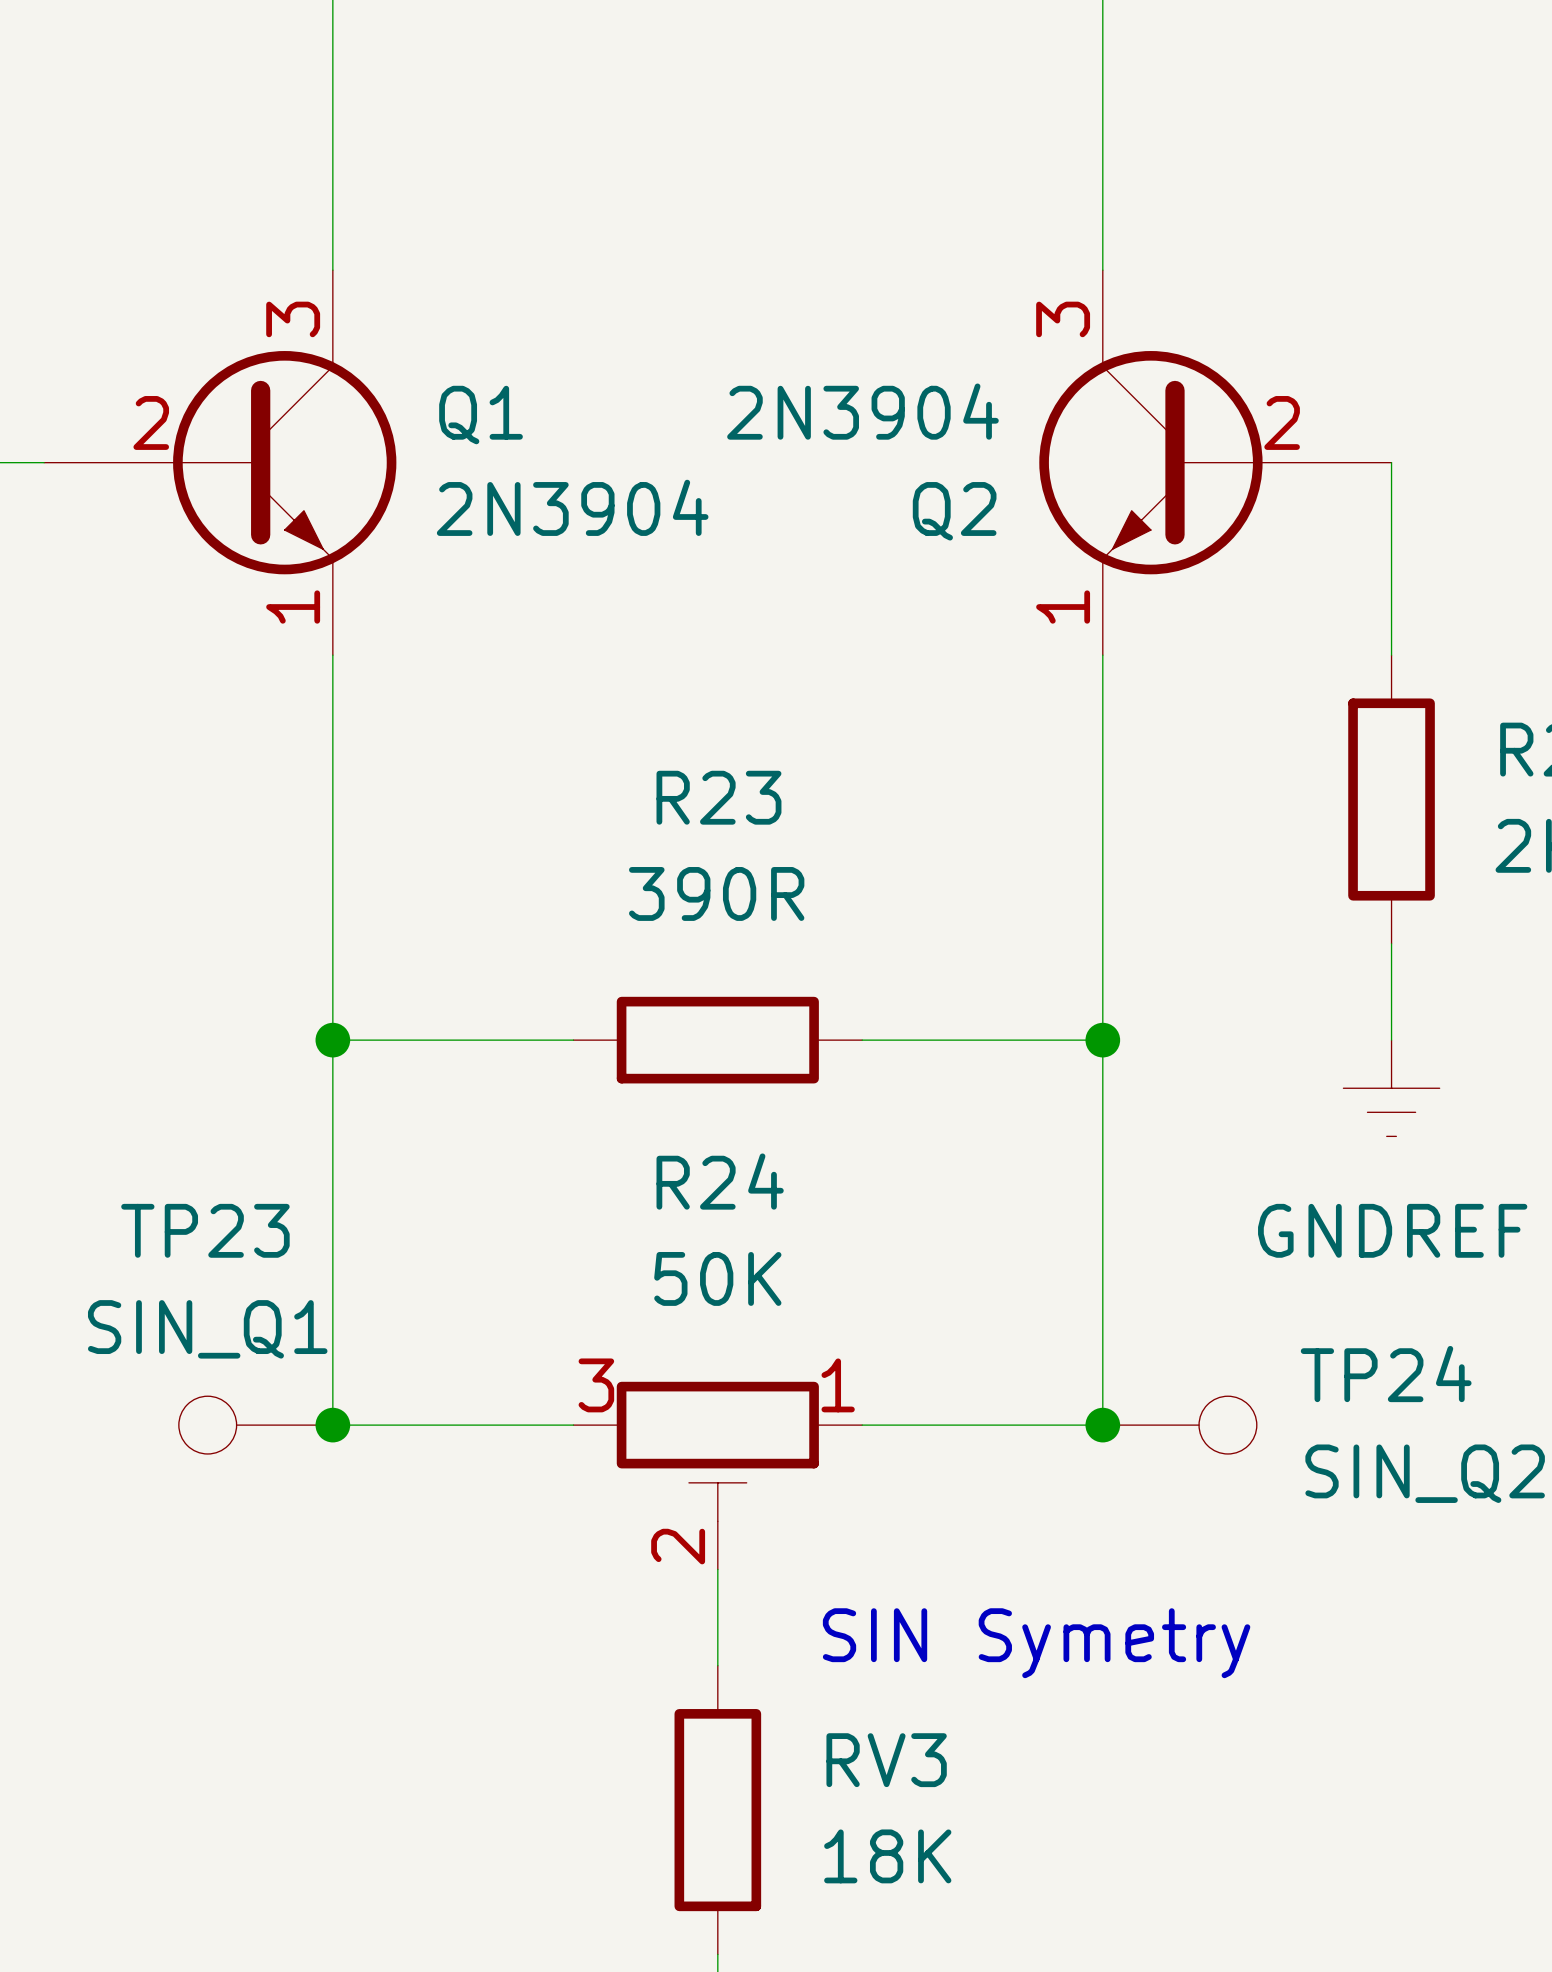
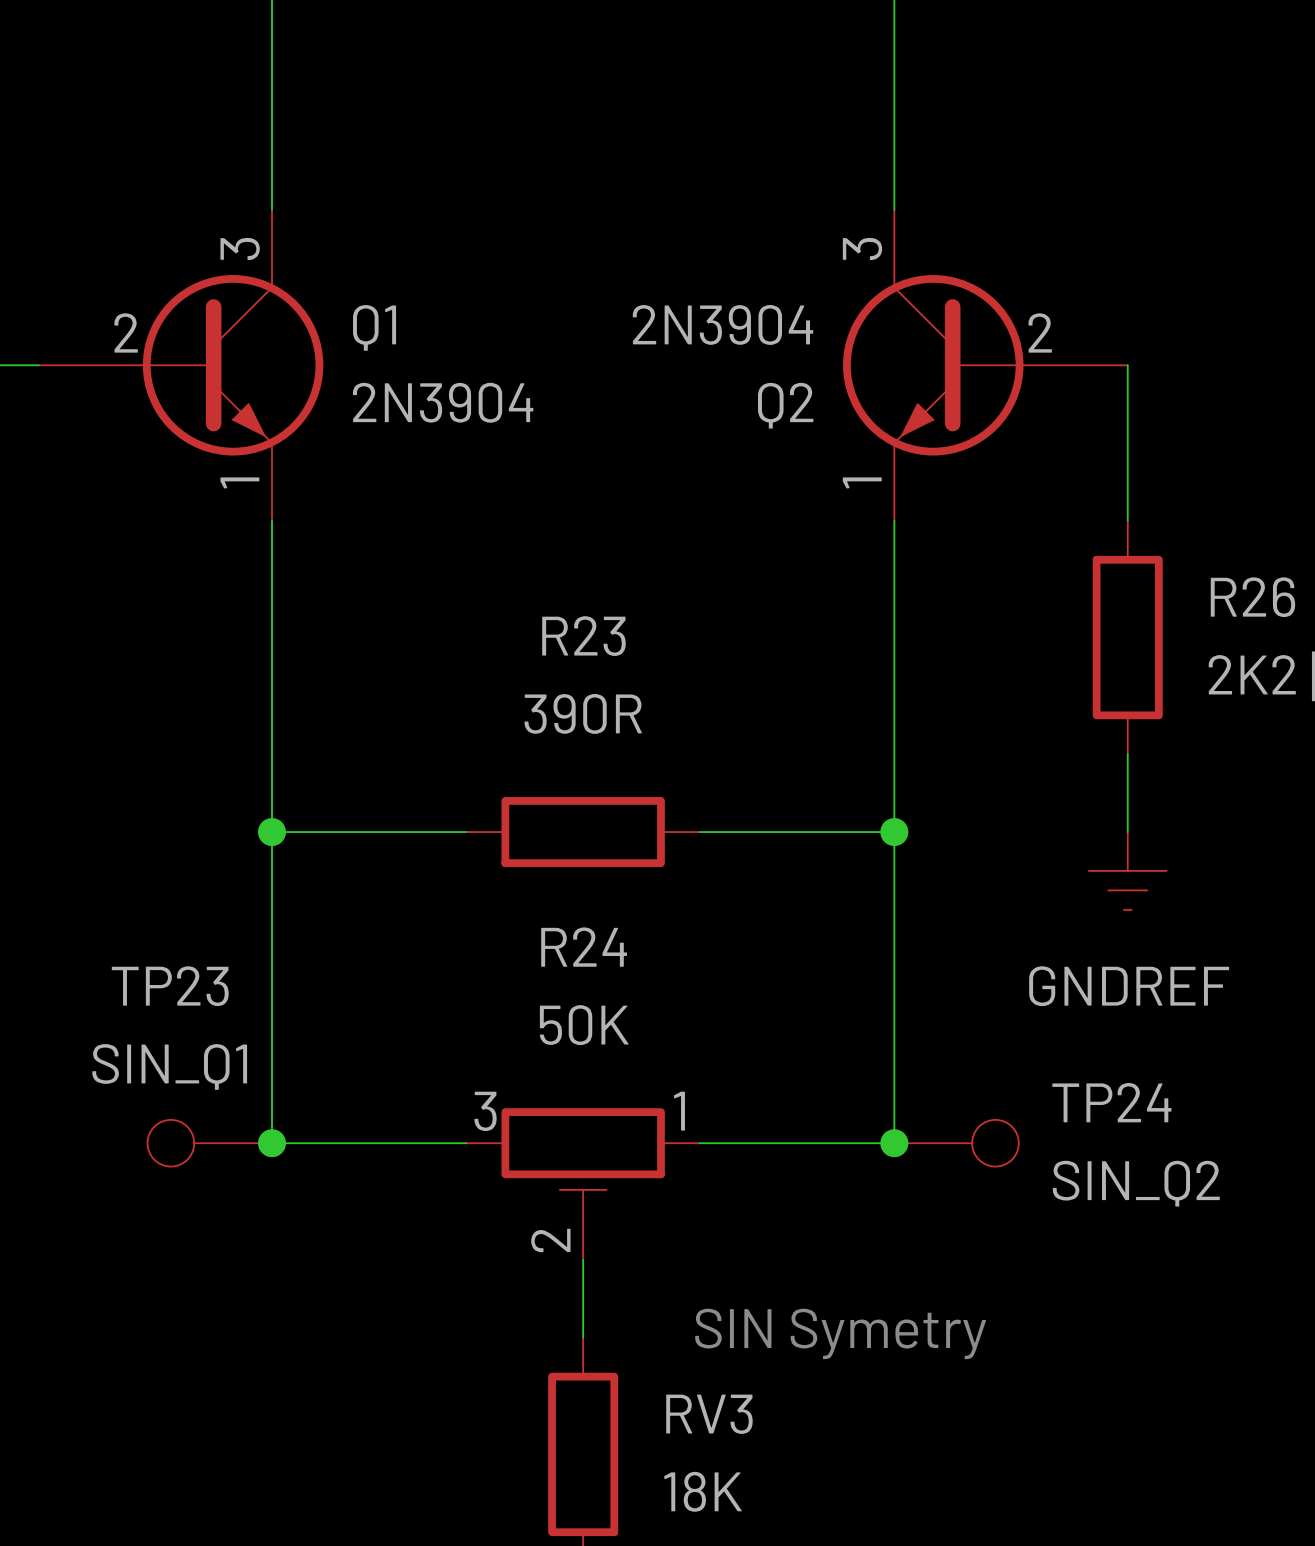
text position: SIN Symetry (1036, 1643) -> SIN Symetry (840, 1333)

